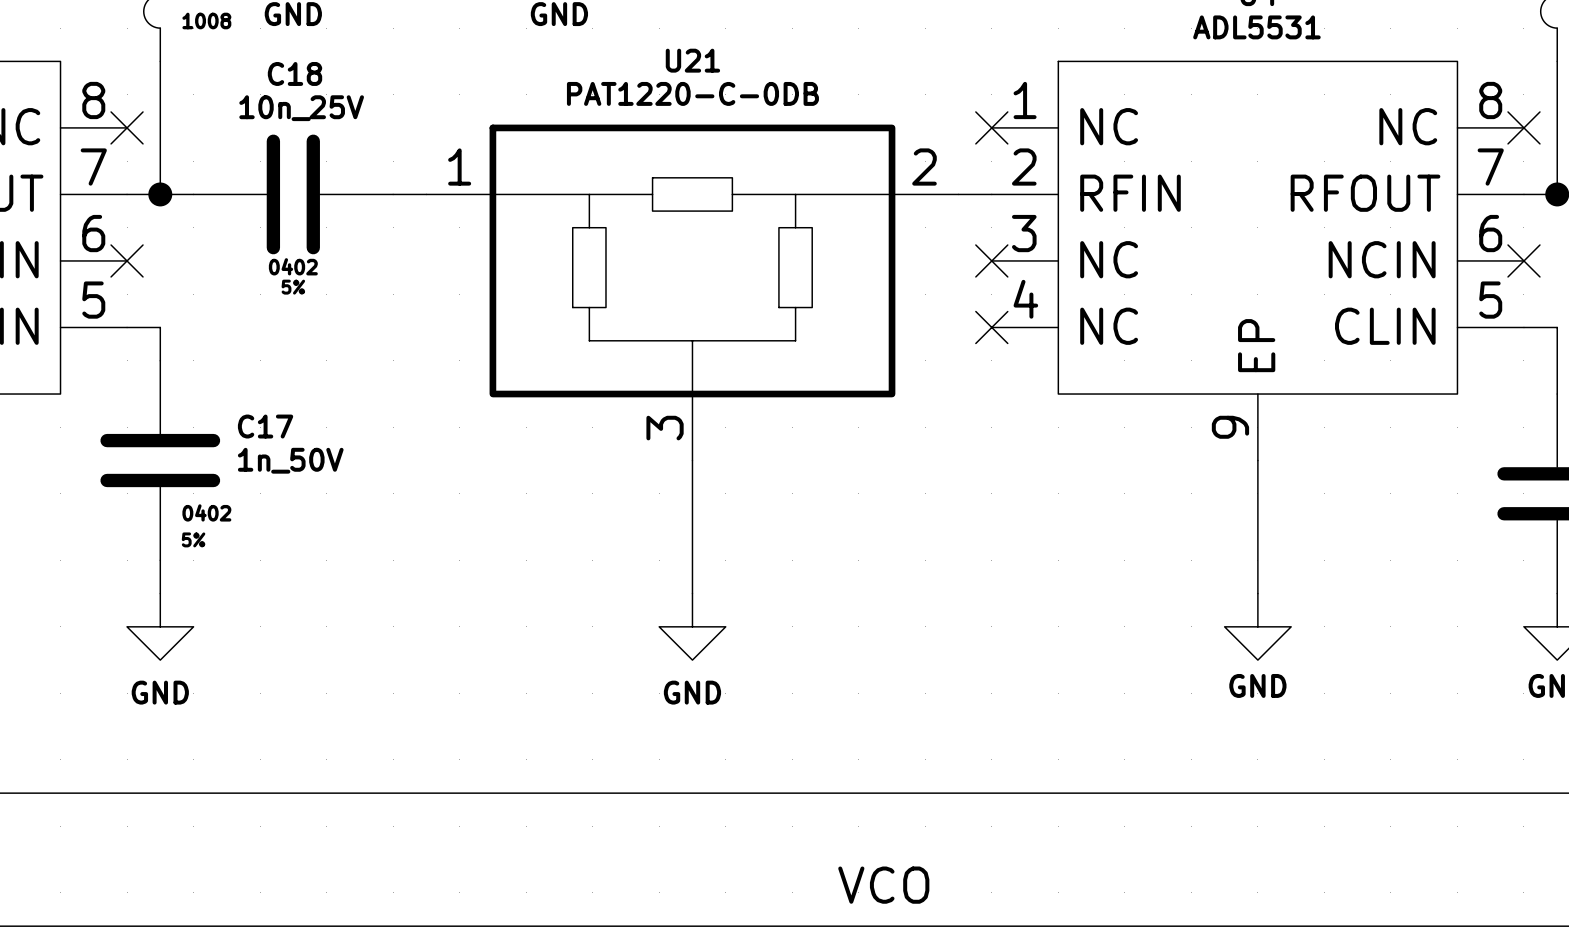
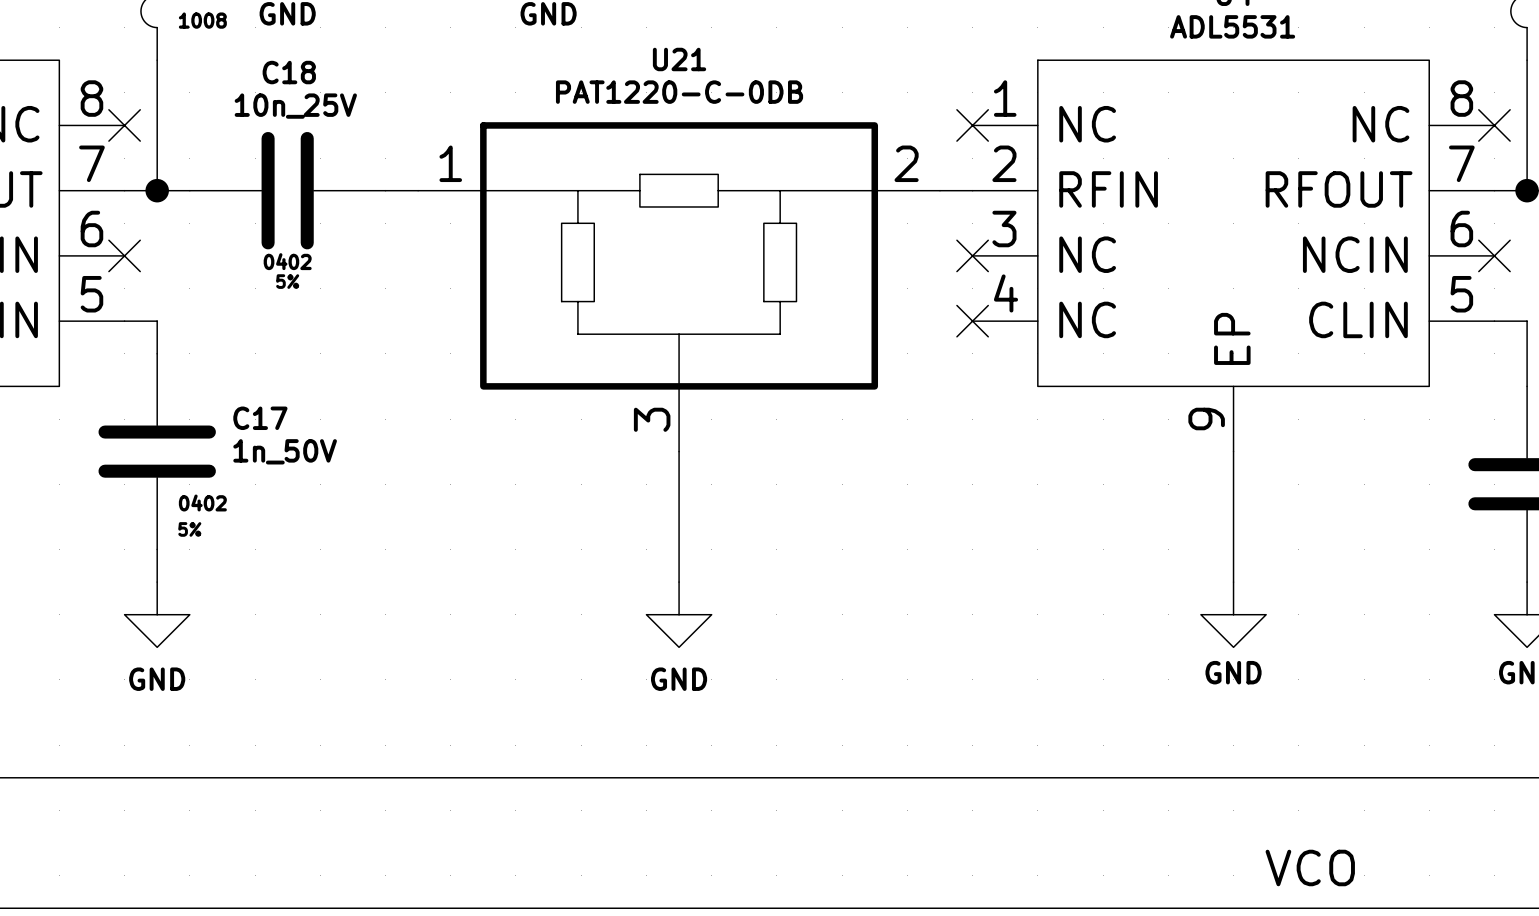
text position: VCO (883, 885) -> VCO (1310, 867)

